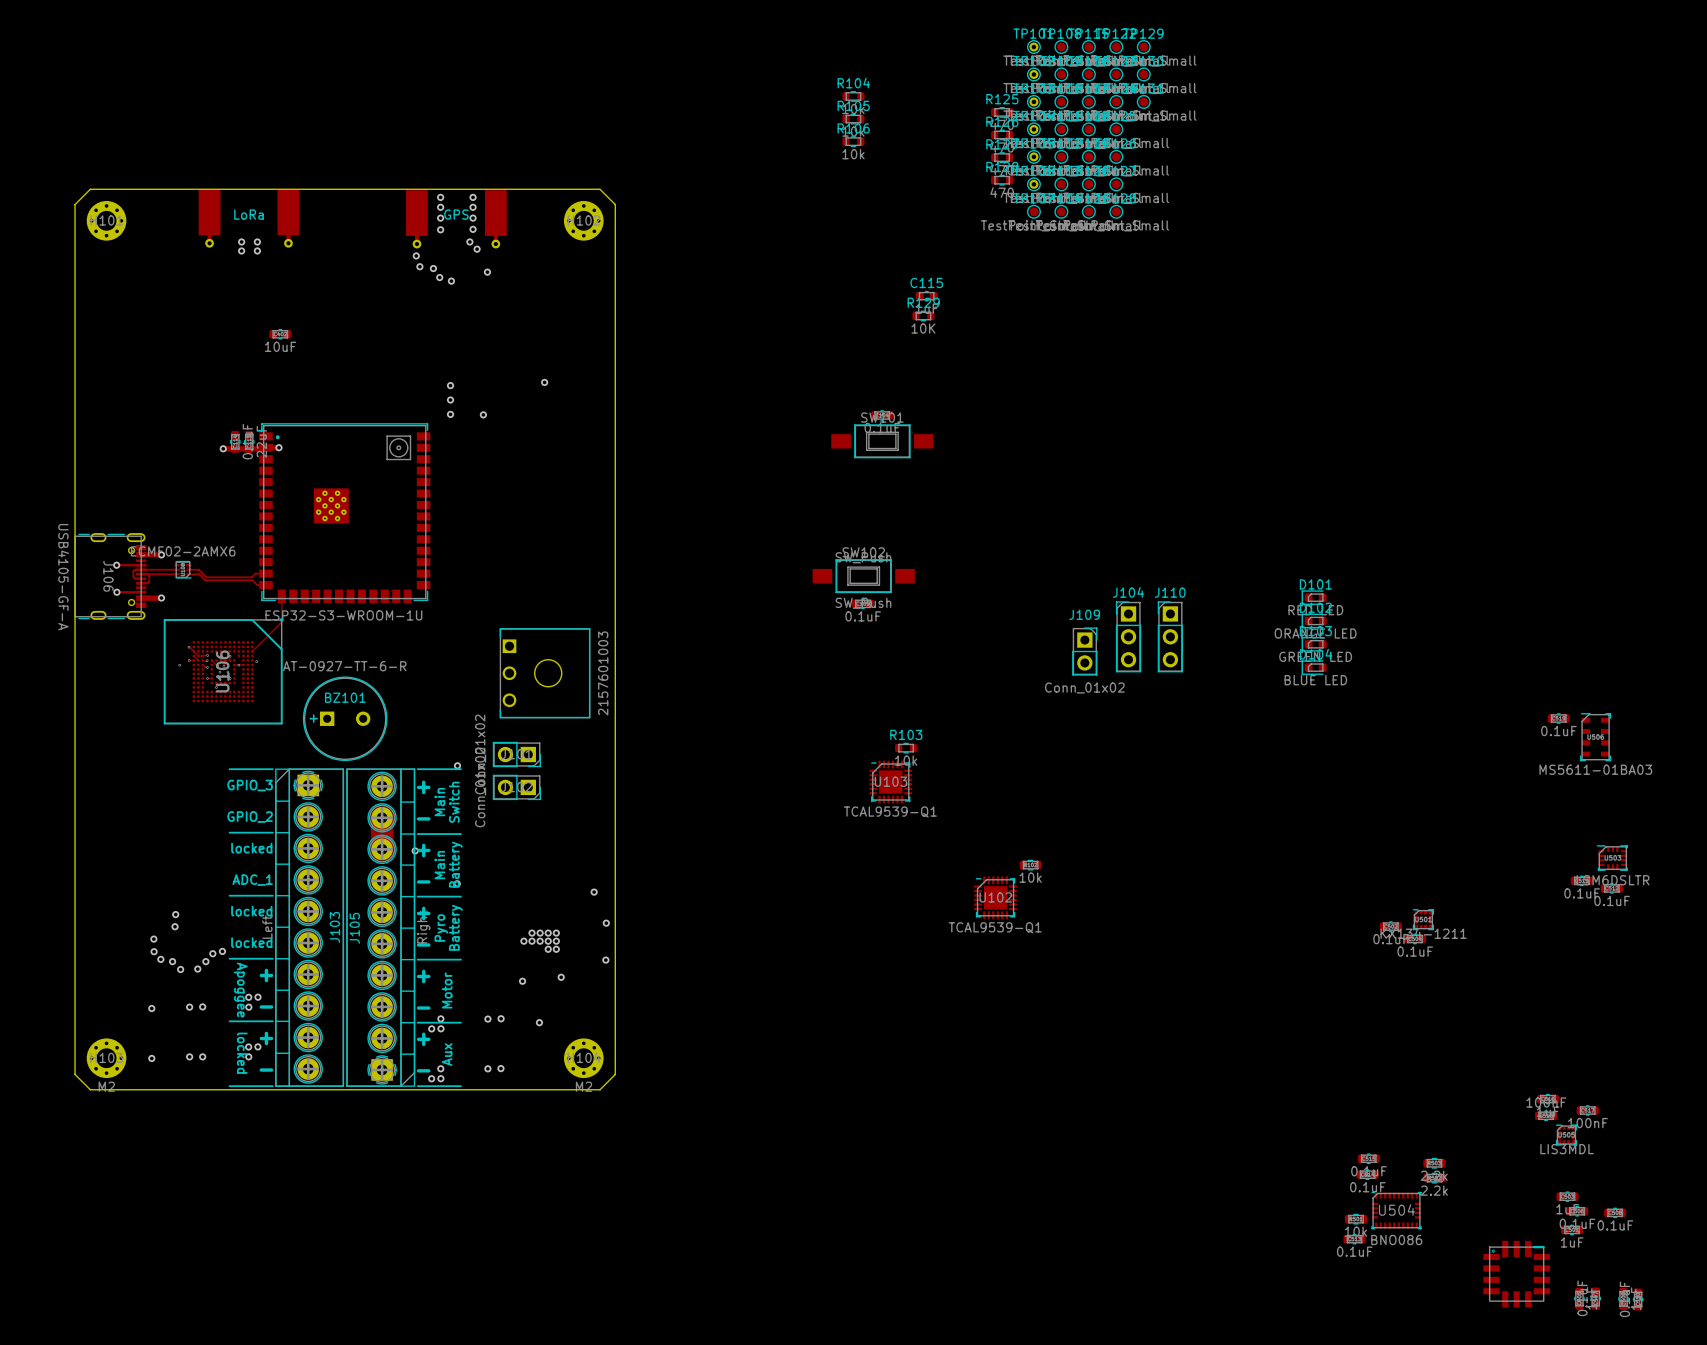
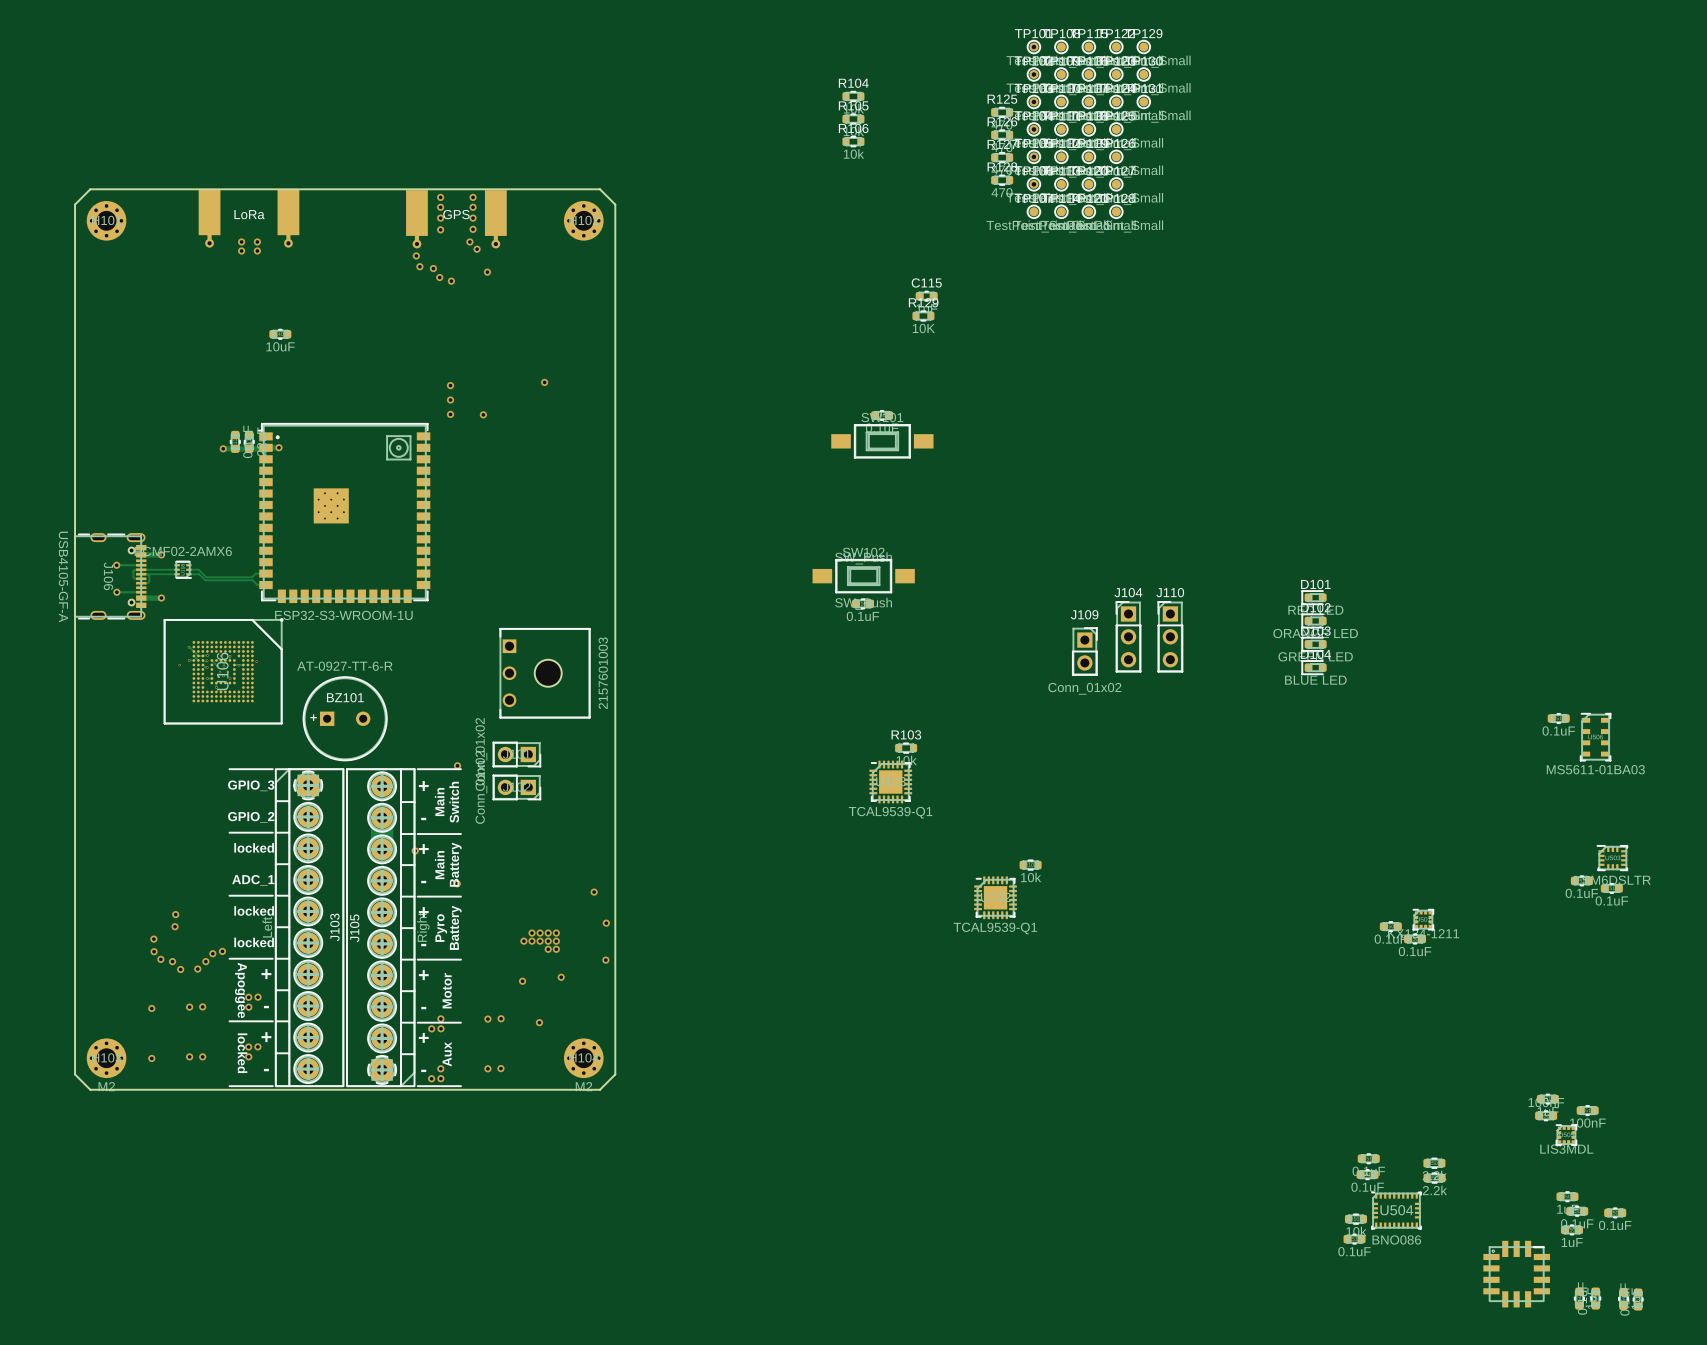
track: (281, 596) (281, 622) (252, 651) -> none

